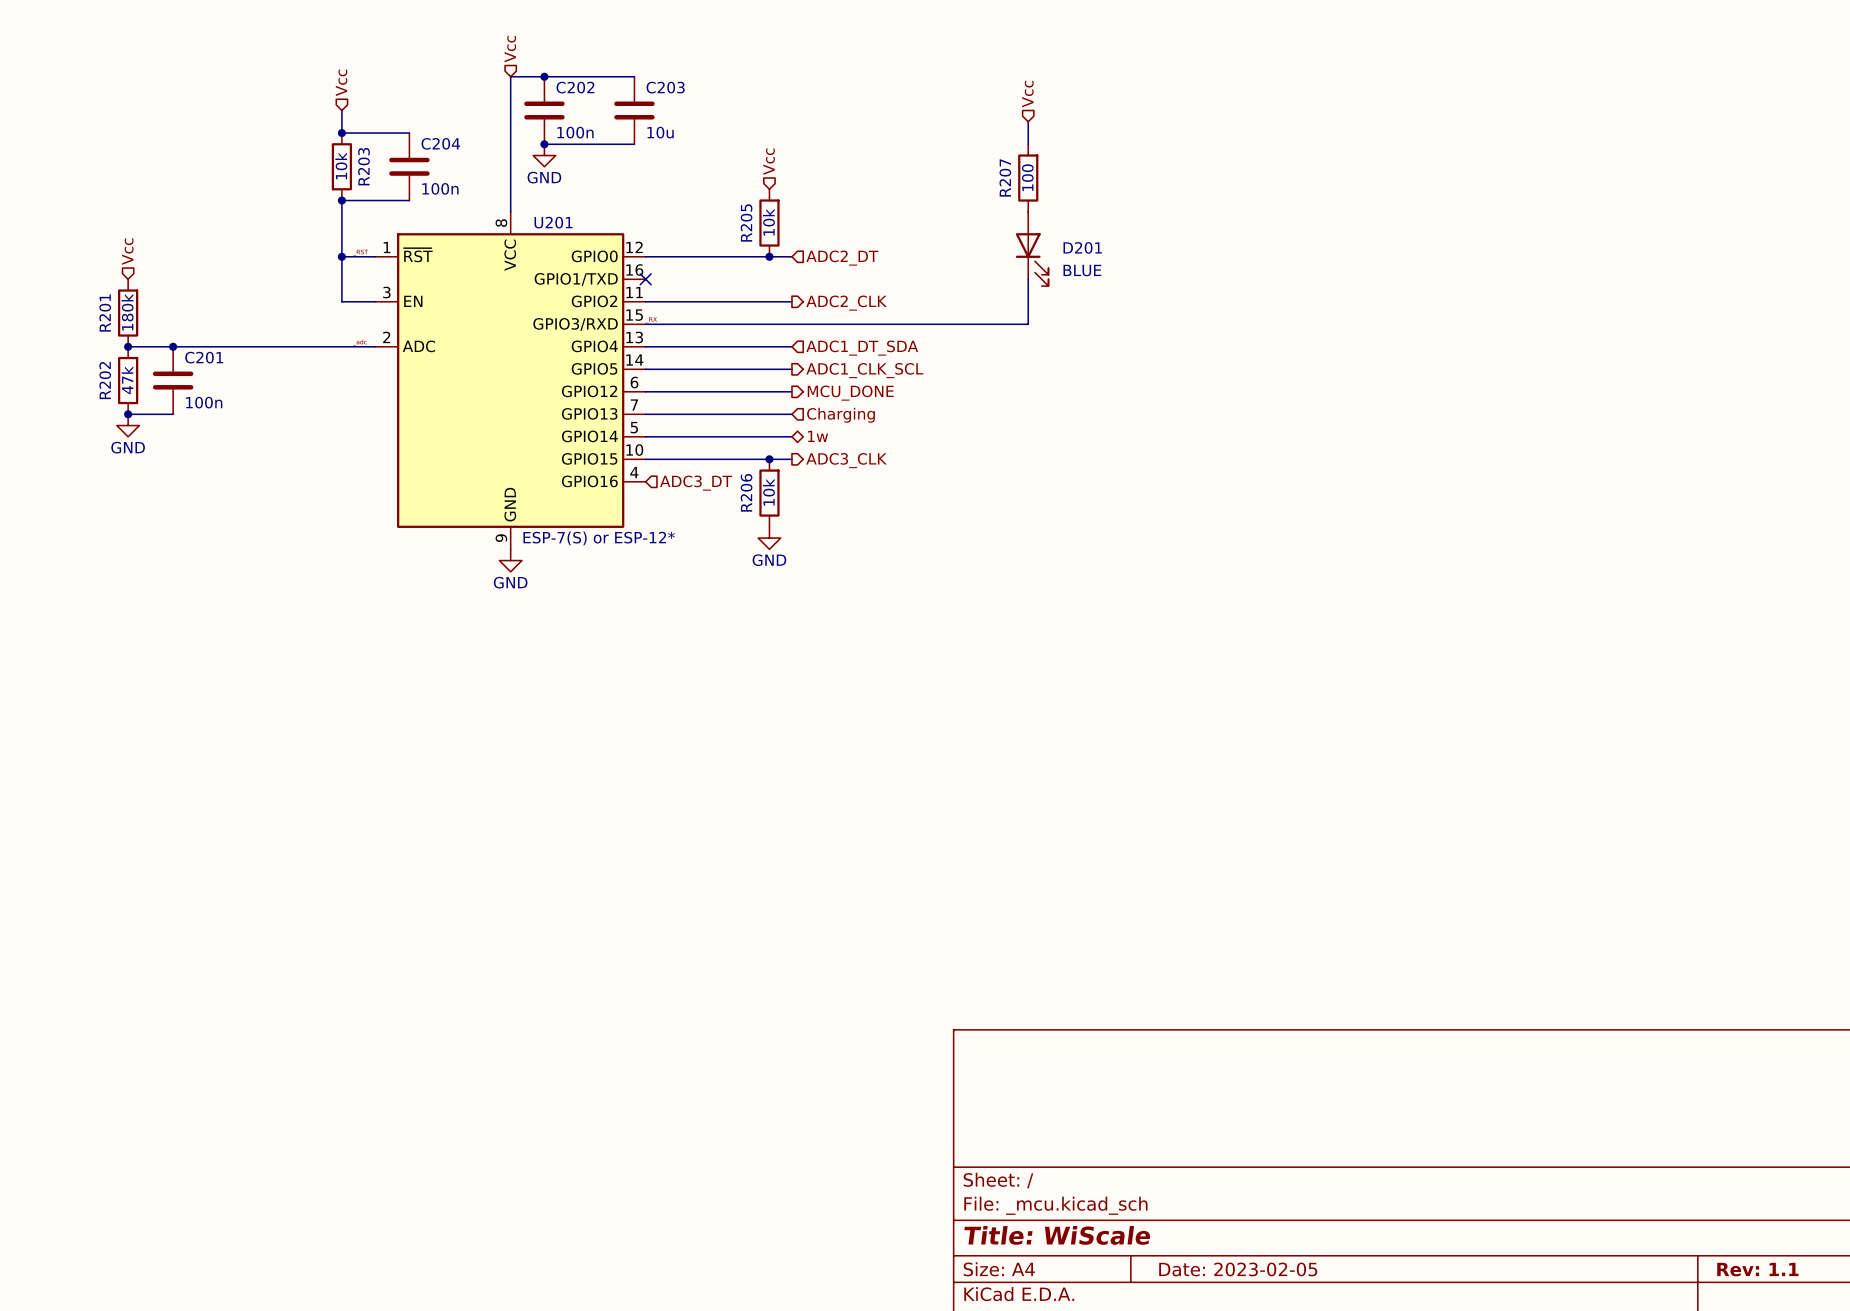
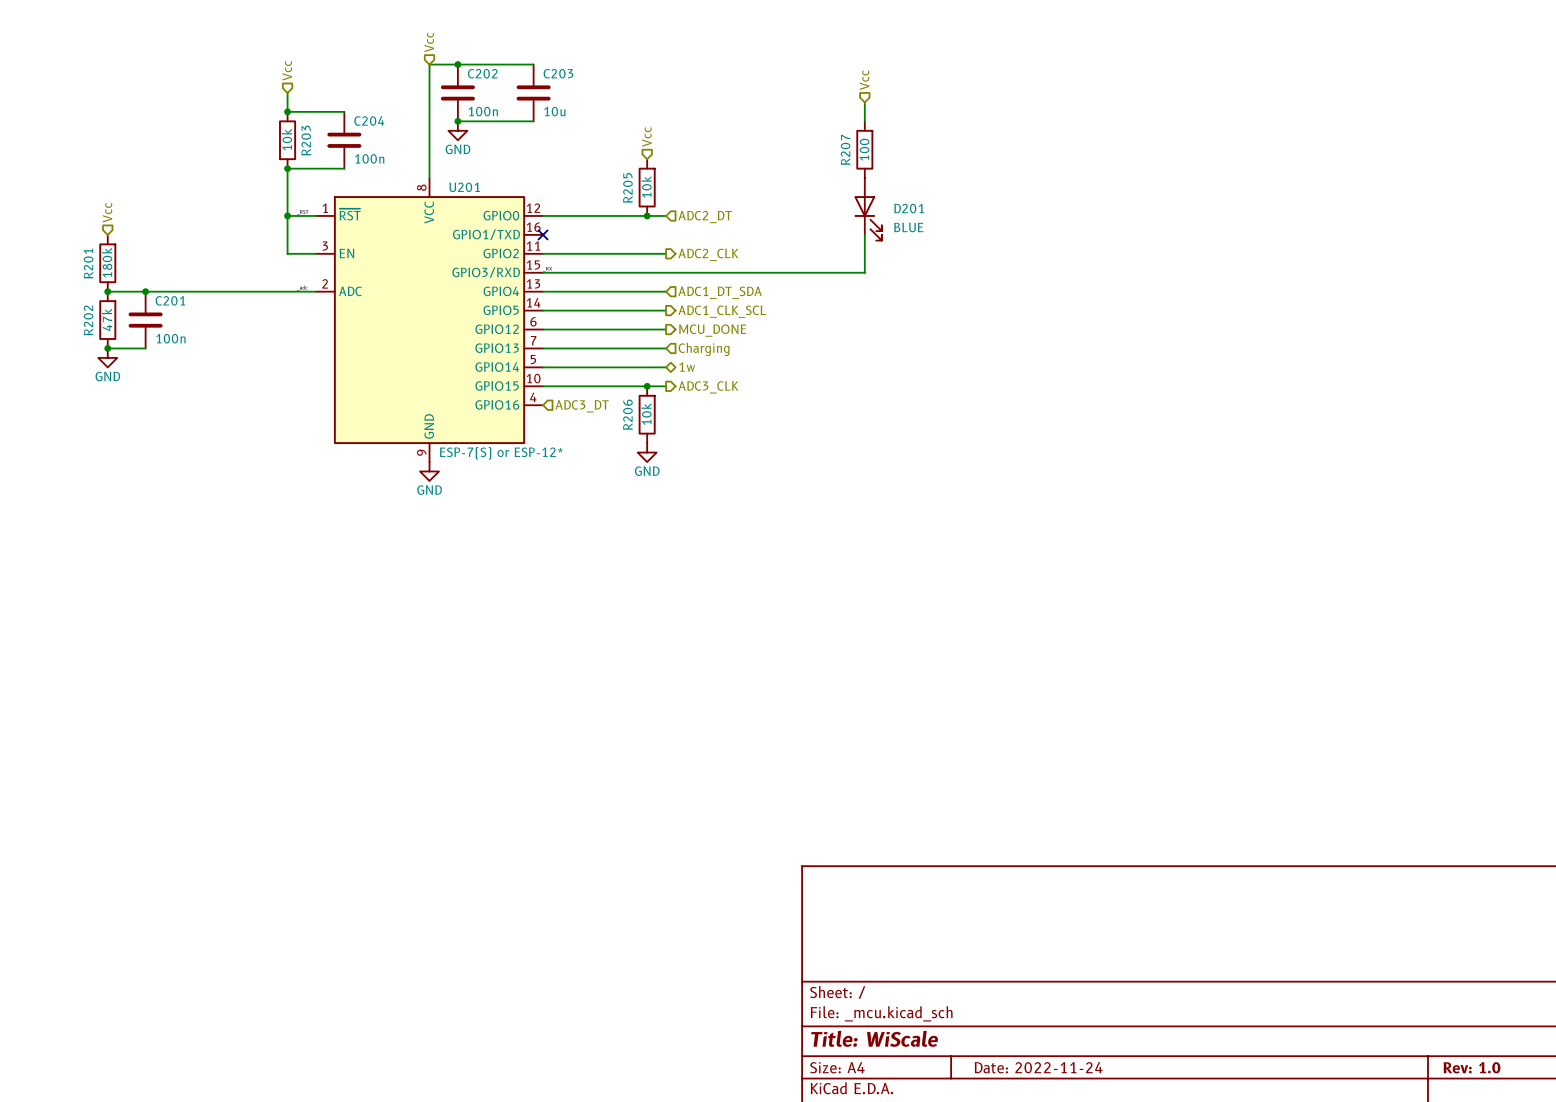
title block: Date: 2023-02-05 (1238, 1269) -> Date: 2022-11-24 (1038, 1067)
title block: Rev: 1.1 (1757, 1269) -> Rev: 1.0 (1471, 1067)

